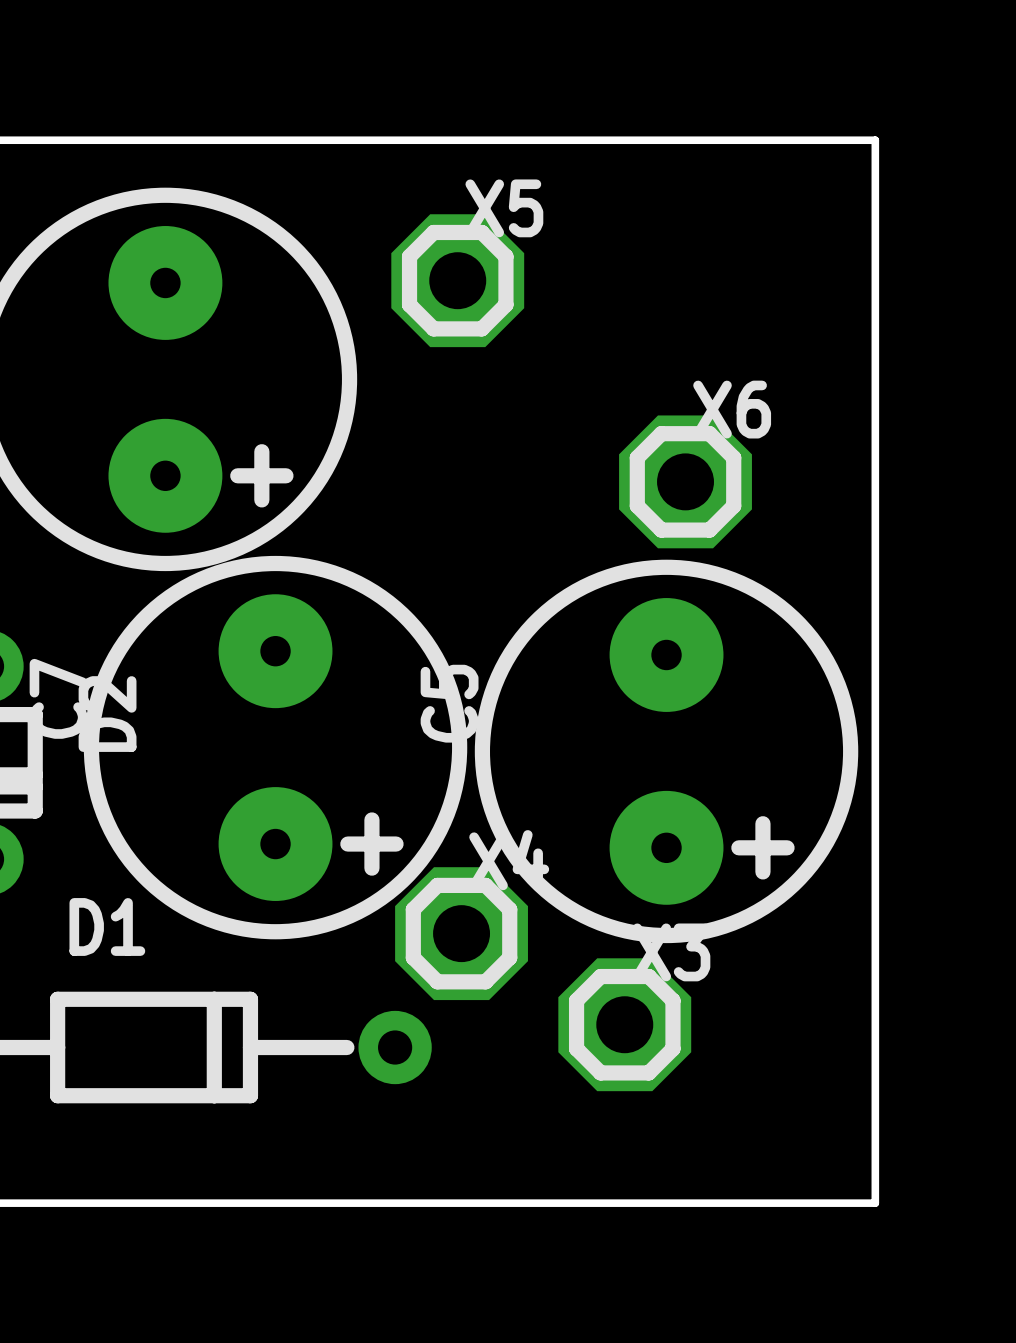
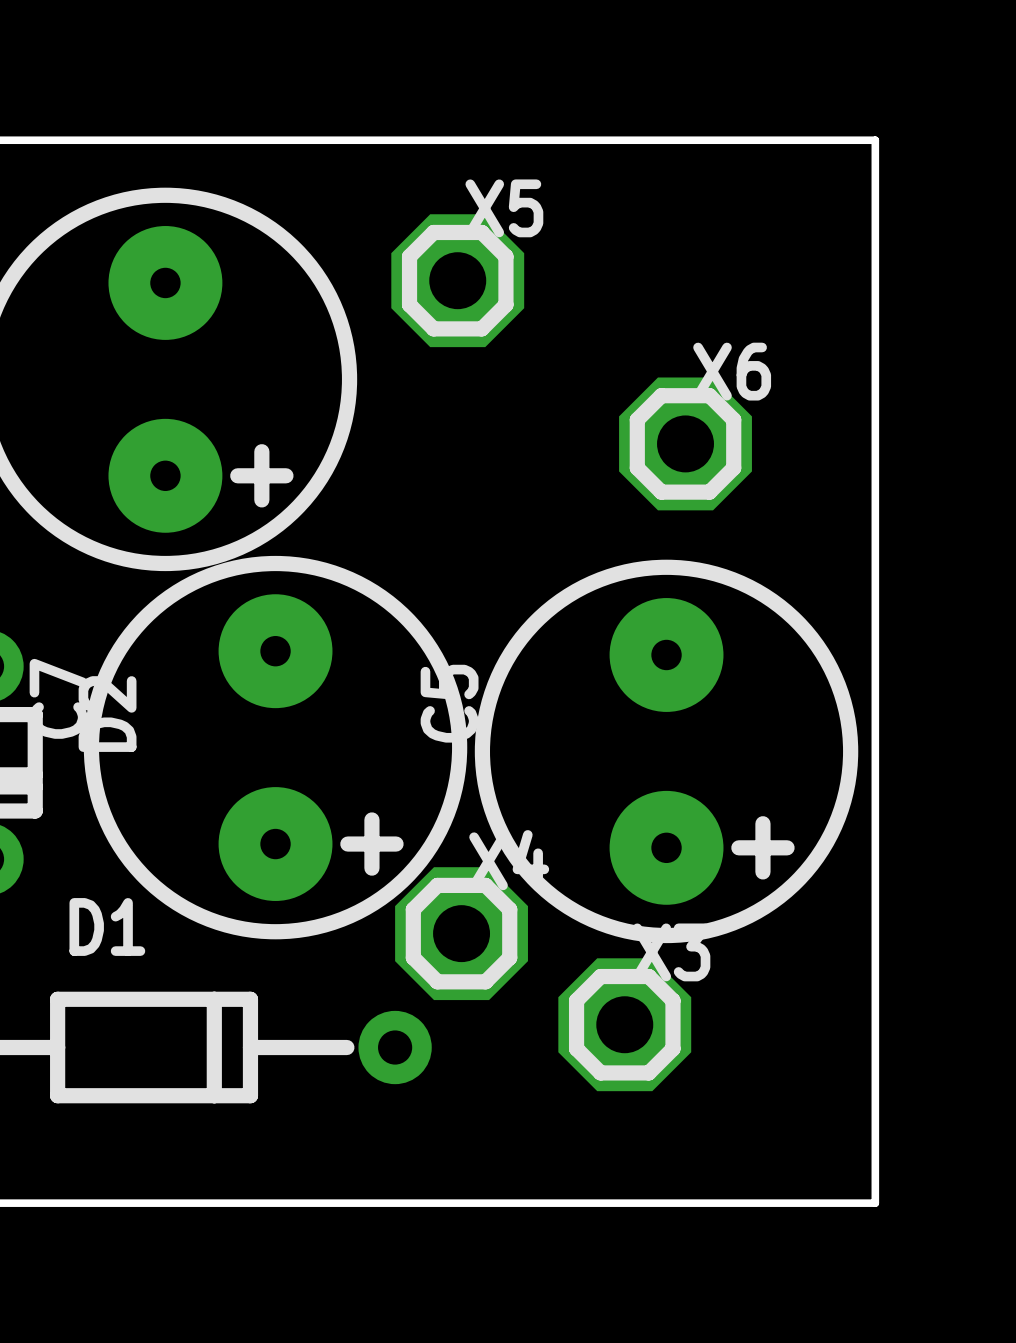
X6 position: (685, 481) -> (685, 443)

